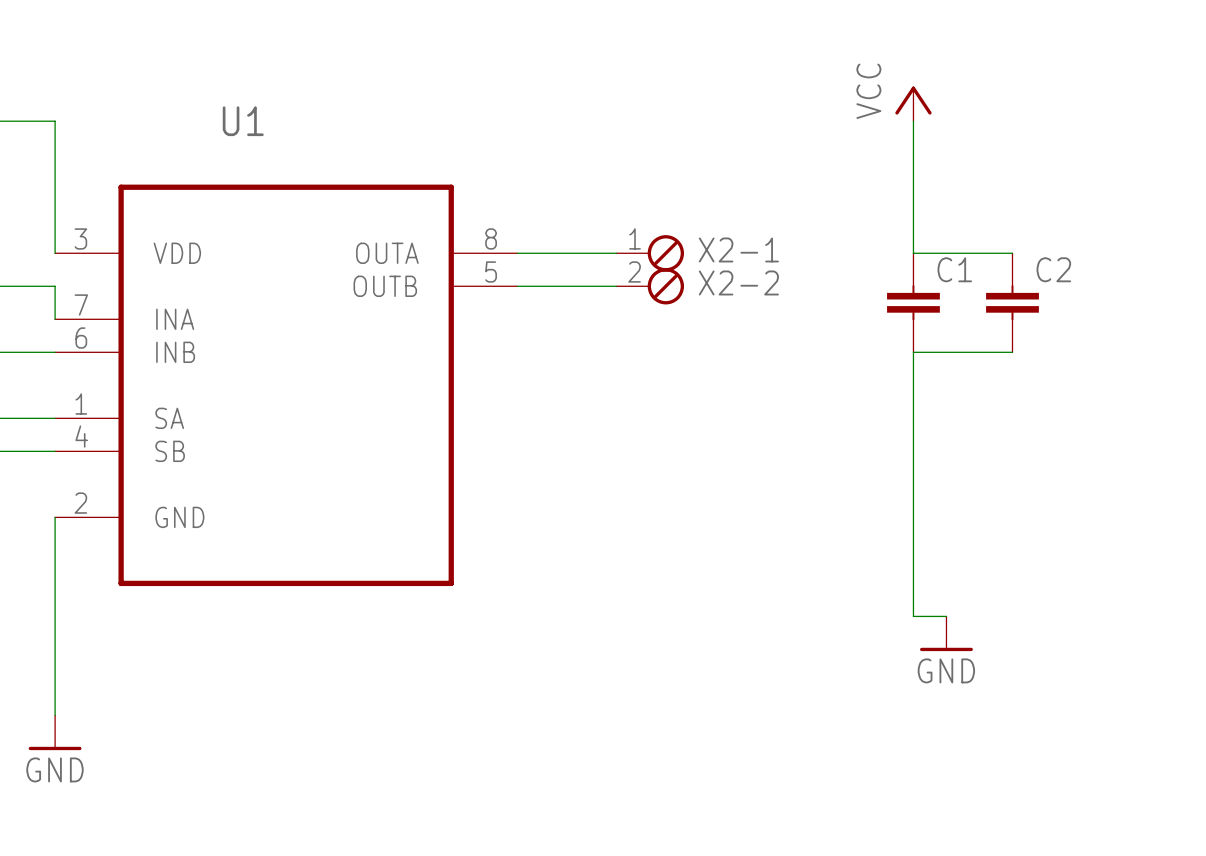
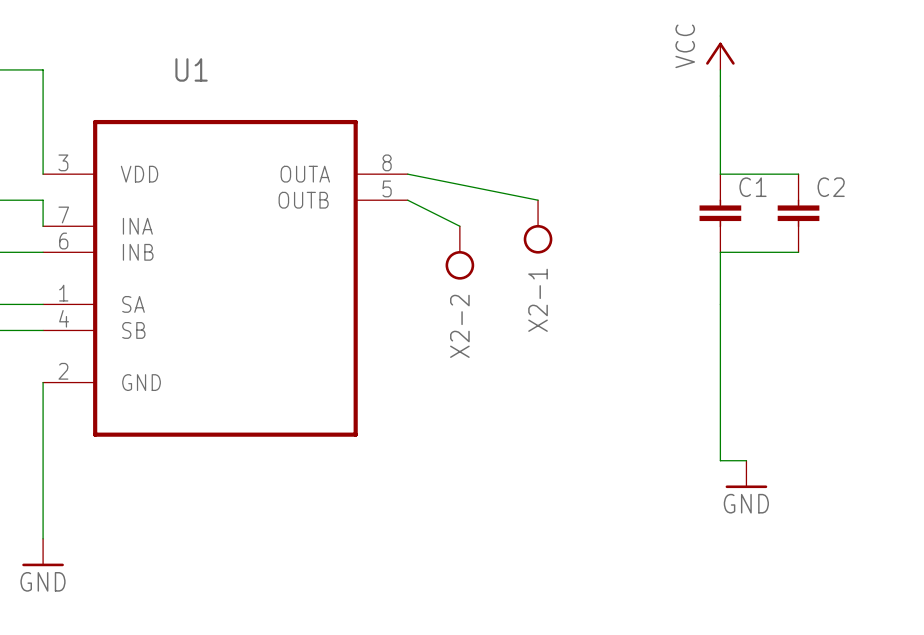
X2-1 symbol: [616, 235, 685, 272] -> [523, 200, 553, 254]
X2-1 name position: X2-1 (738, 249) -> X2-1 (538, 300)
wire: (517, 253) (616, 253) -> (407, 174) (538, 200)
X2-2 symbol: [616, 268, 685, 305] -> [445, 226, 475, 280]
X2-2 name position: X2-2 (738, 282) -> X2-2 (459, 326)
wire: (517, 286) (616, 286) -> (407, 200) (459, 226)

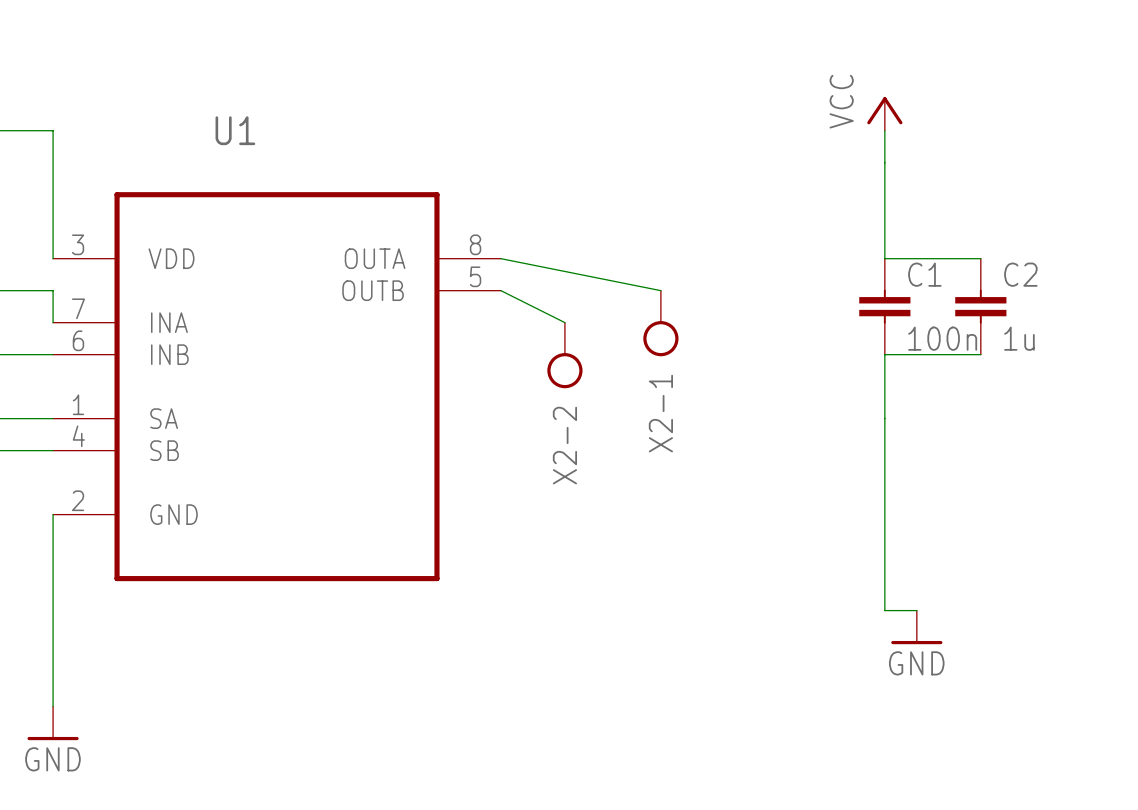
C1 value: none -> 100n (942, 338)
C2 value: none -> 1u (1019, 338)

